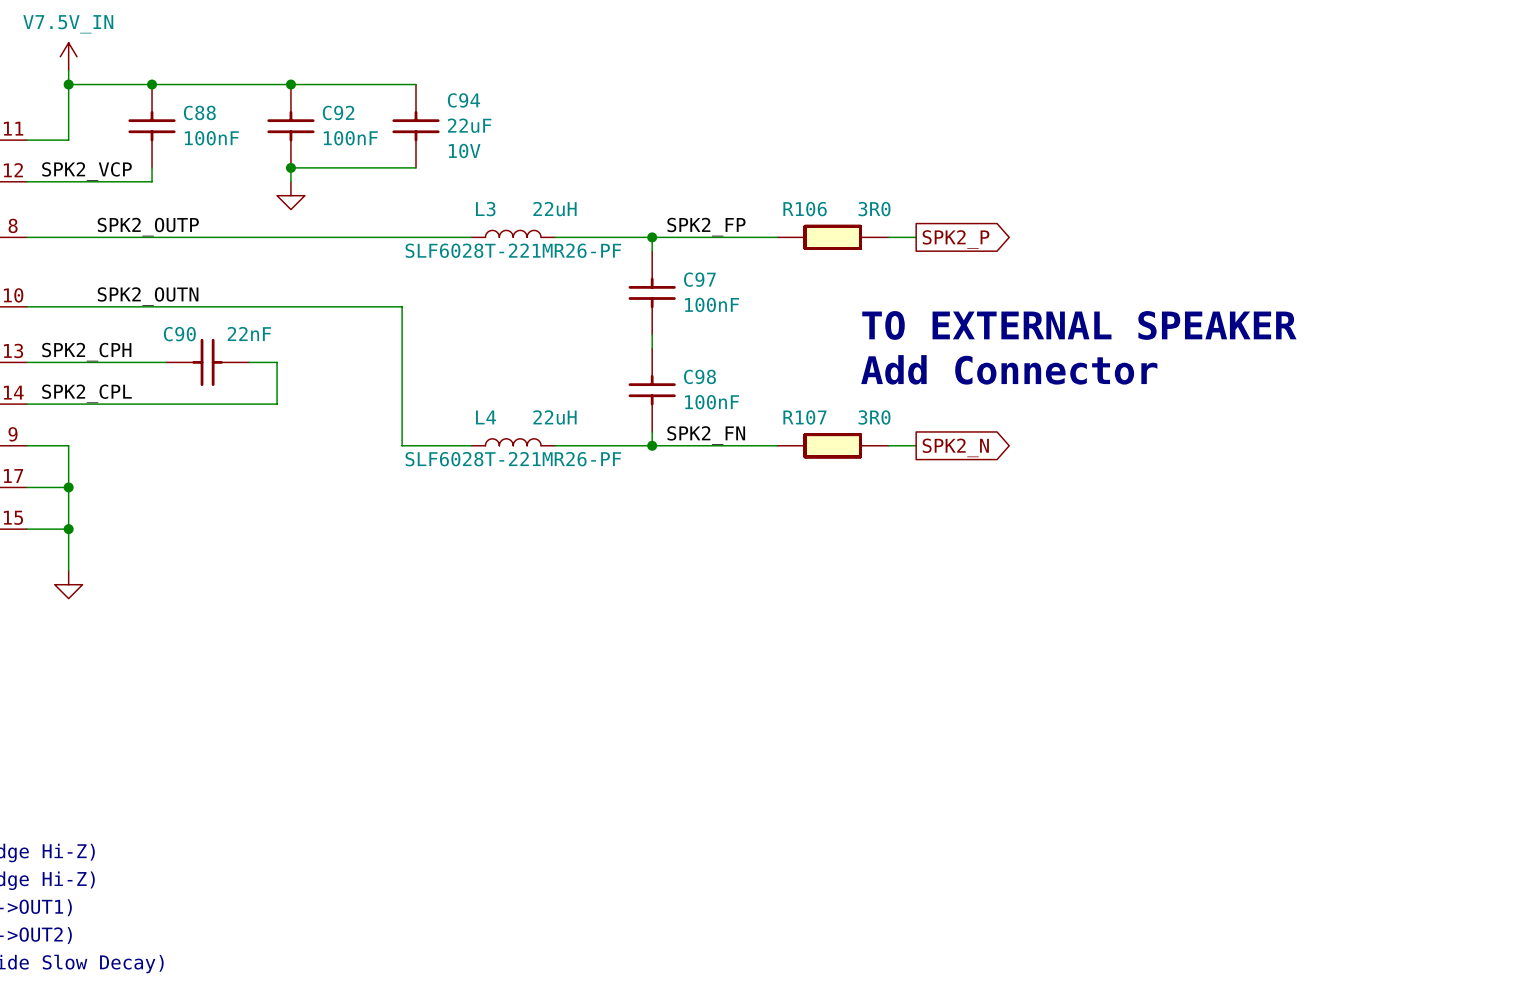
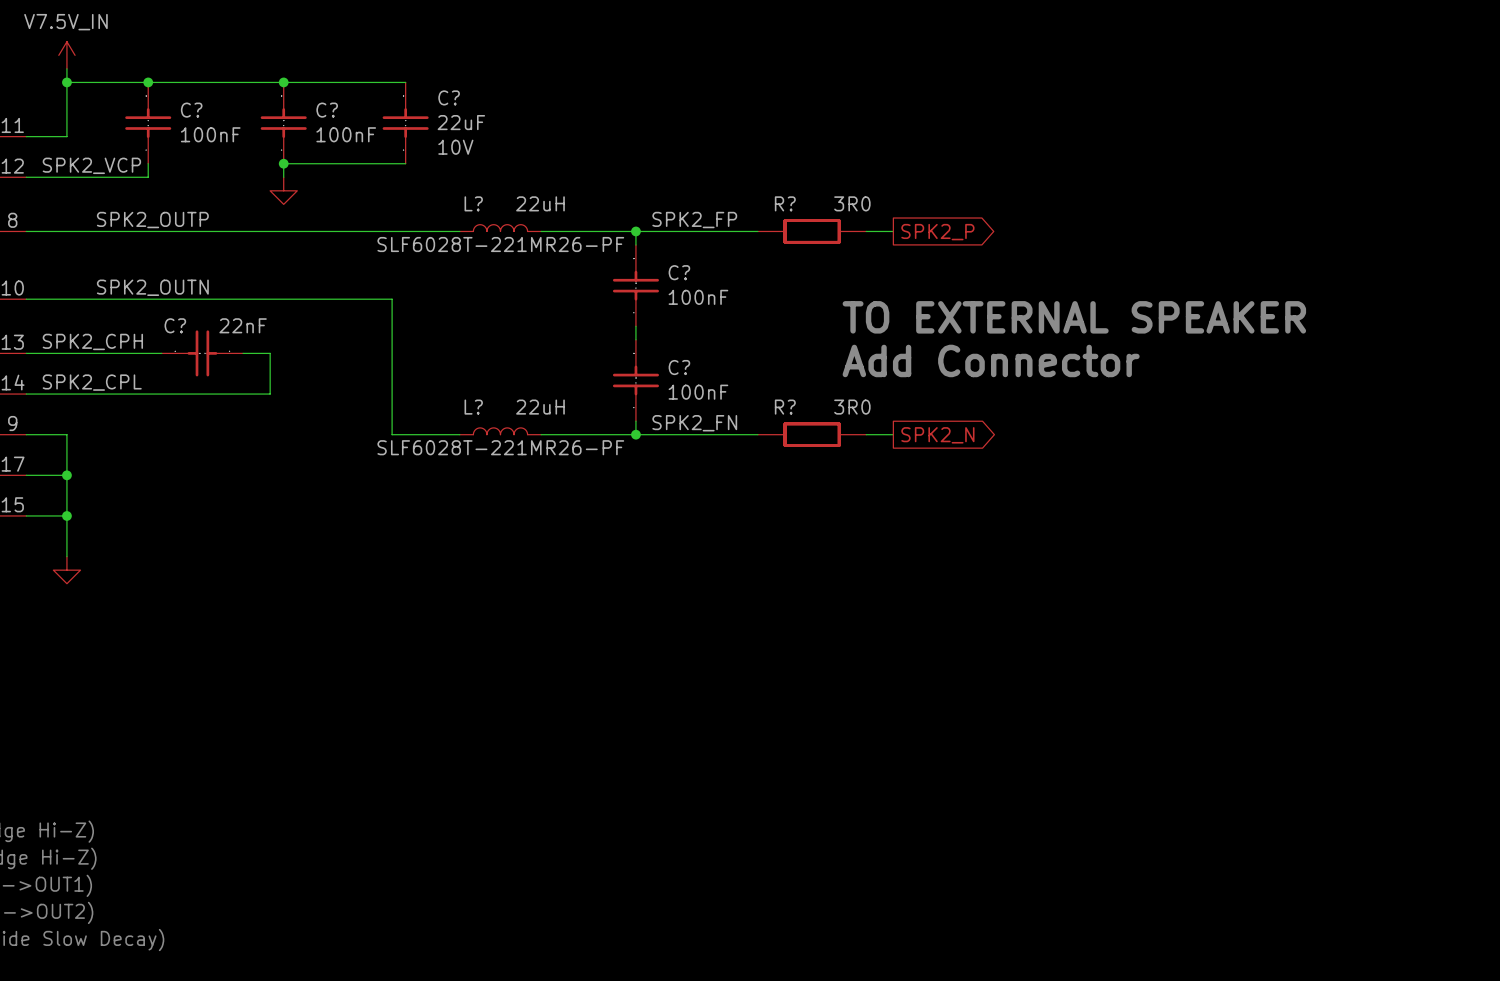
C94 name: C94 (463, 100) -> C? (449, 97)
C88 name: C88 (199, 112) -> C? (191, 110)
C92 name: C92 (338, 112) -> C? (327, 110)
L3 name: L3 (485, 209) -> L? (473, 203)
R106 name: R106 (805, 209) -> R? (785, 203)
C97 name: C97 (699, 279) -> C? (679, 272)
C90 name: C90 (179, 334) -> C? (175, 325)
C98 name: C98 (700, 376) -> C? (679, 367)
L4 name: L4 (486, 417) -> L? (473, 407)
R107 name: R107 (804, 417) -> R? (785, 407)

